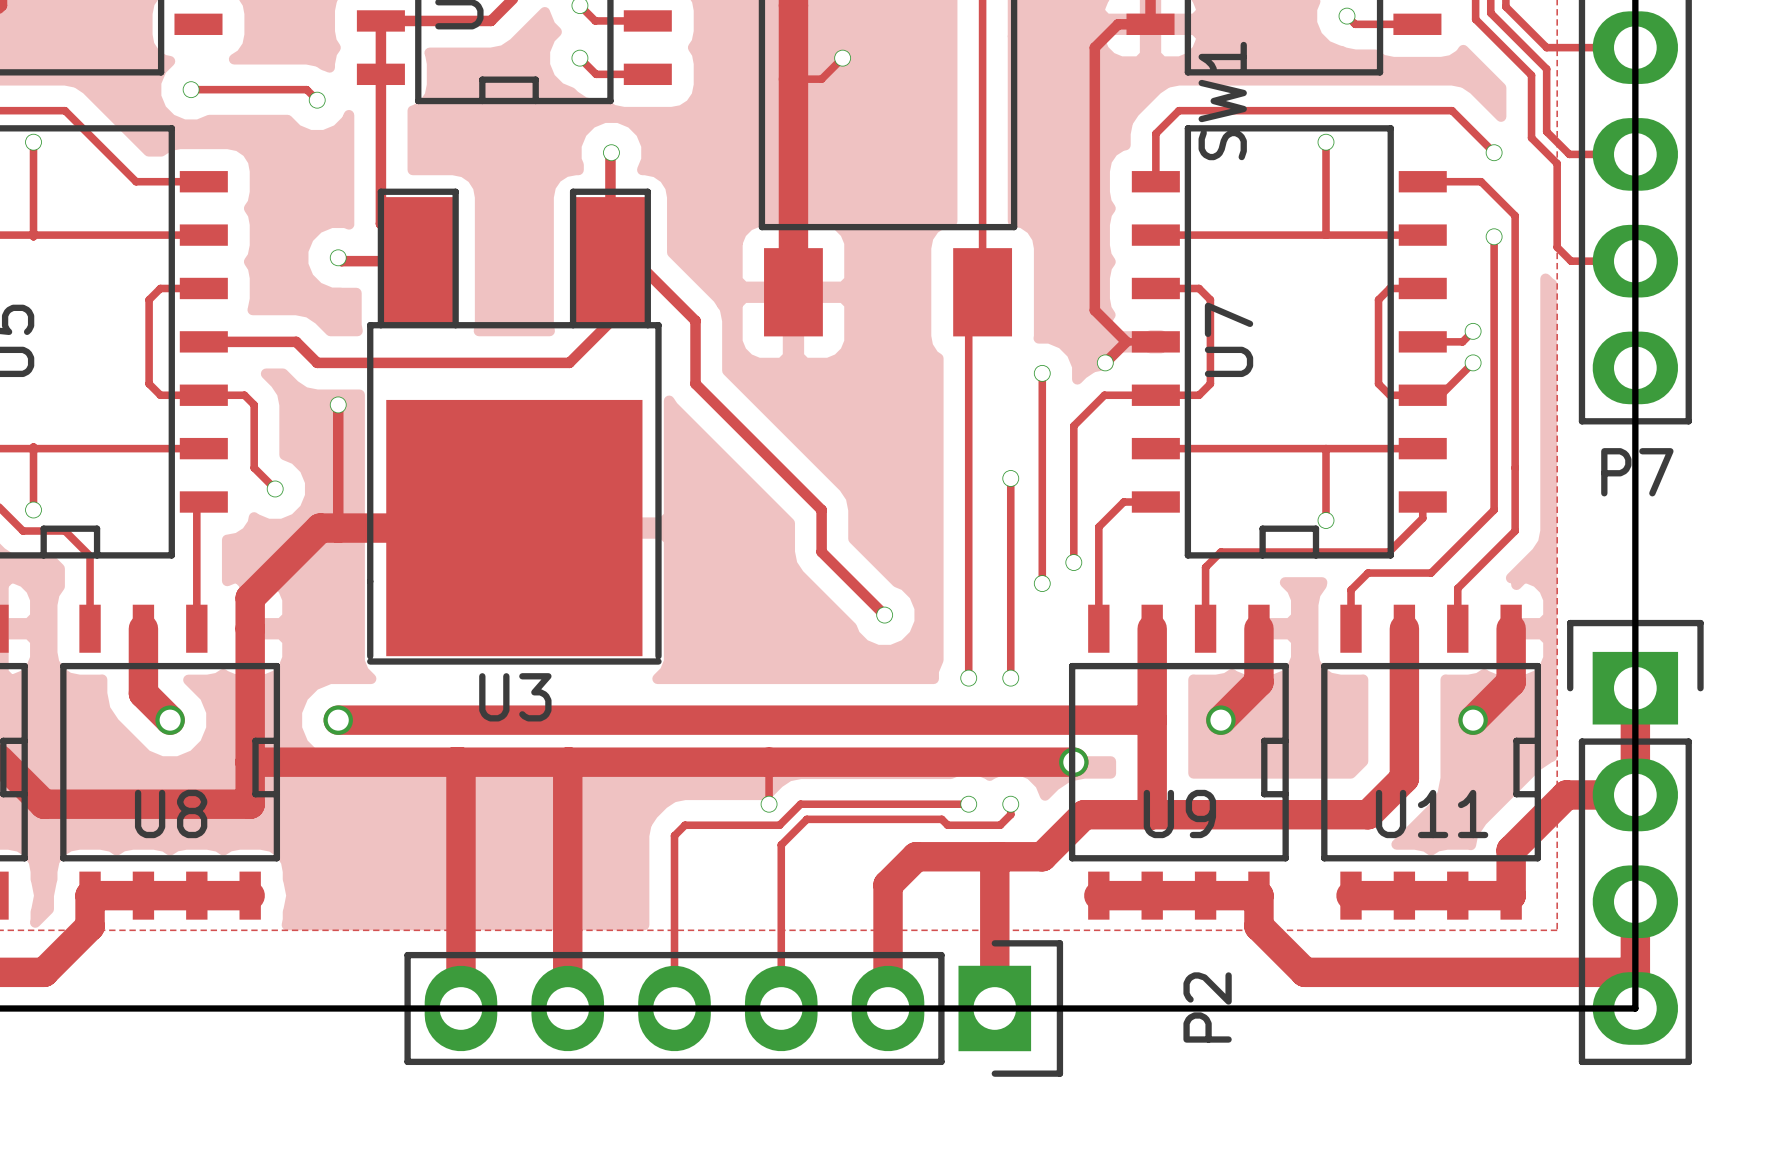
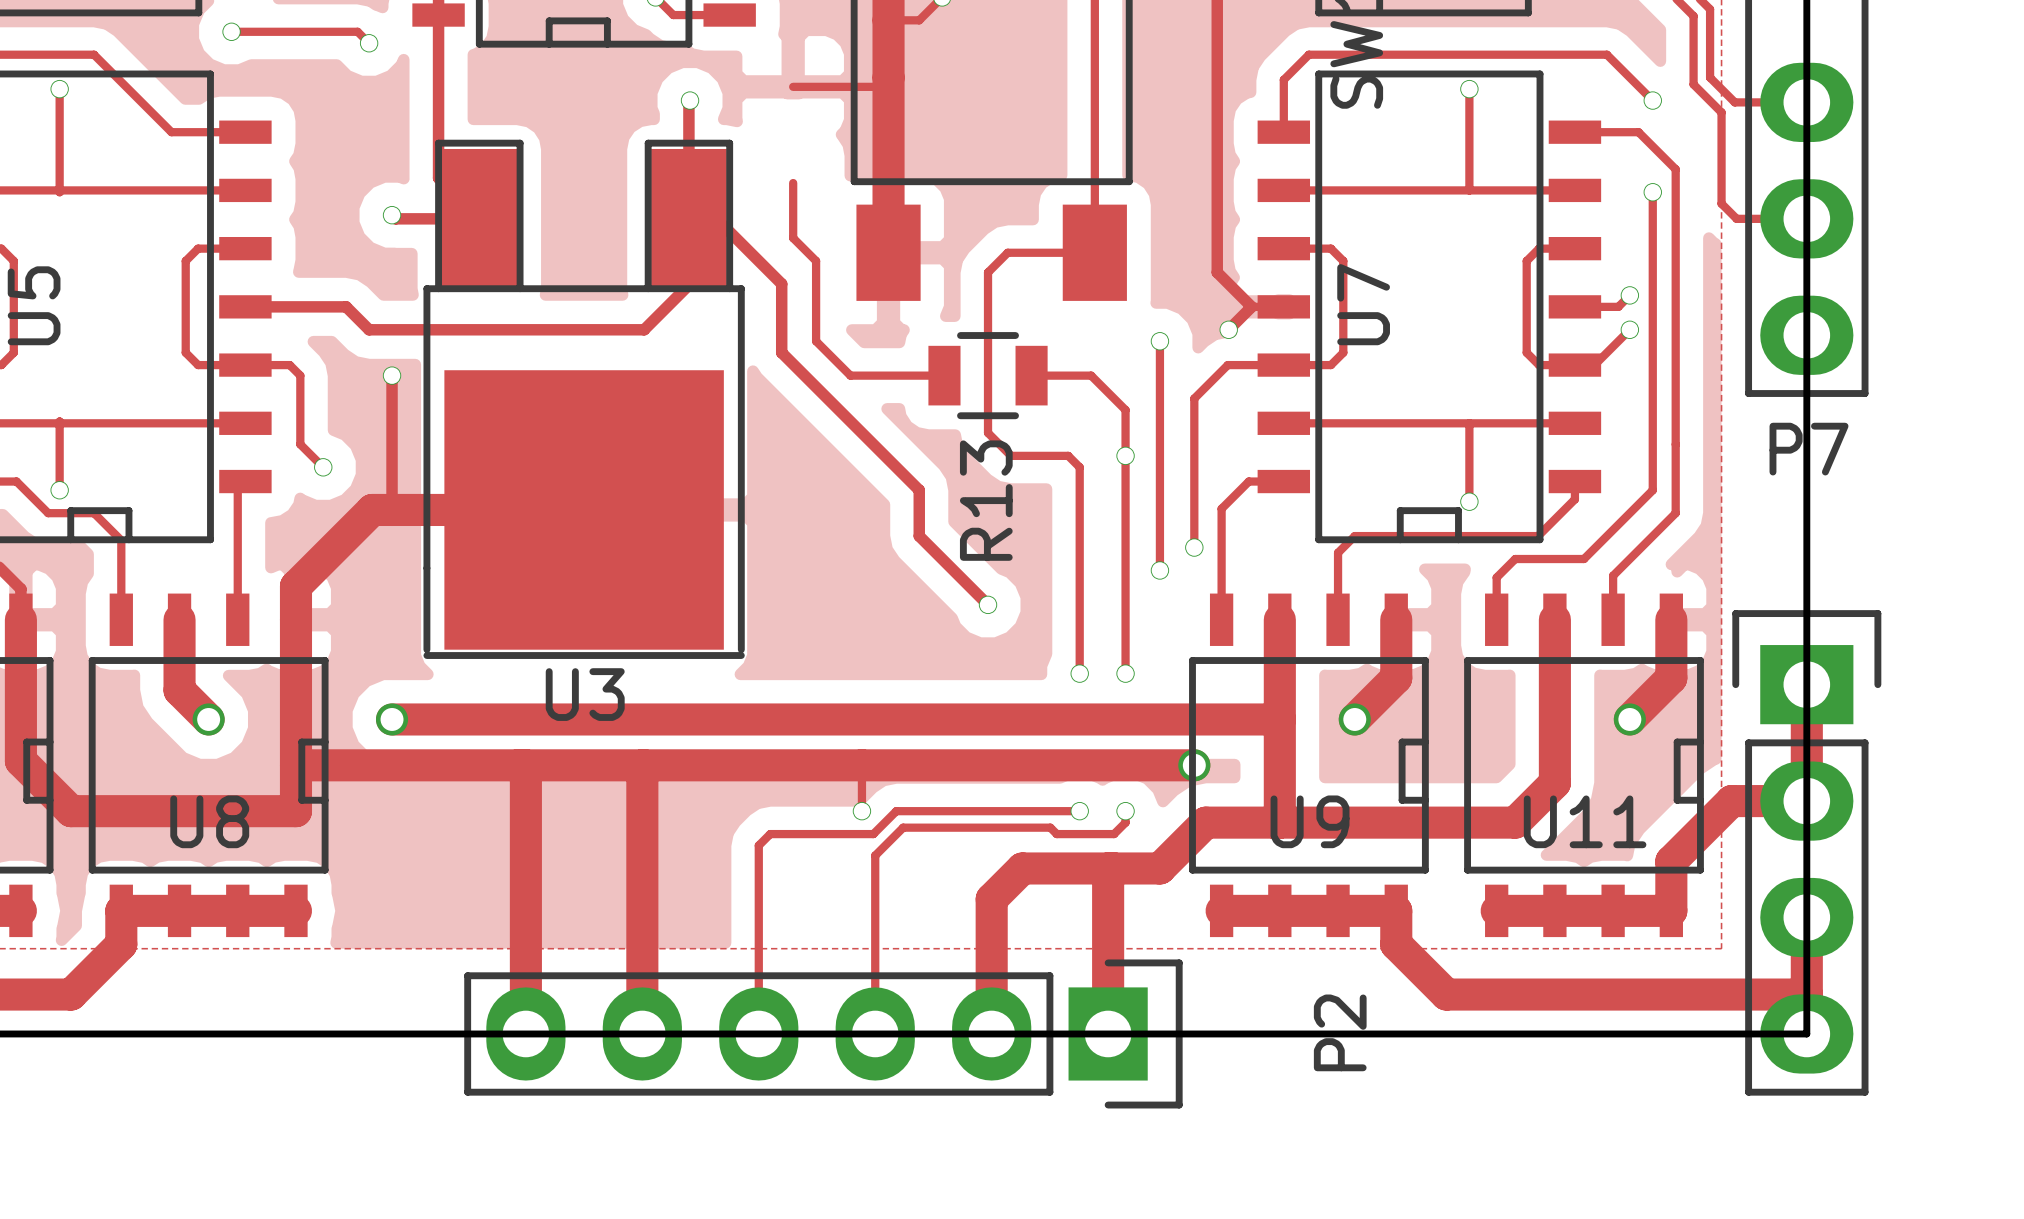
track: none -> (888, 77) (896, 77) (888, 86) (793, 86)
track: none -> (793, 183) (793, 238) (816, 261) (816, 341) (850, 375) (944, 375)
track: (968, 306) (968, 488) -> (1094, 252) (1007, 252) (988, 272) (988, 432) (1010, 455) (1068, 455) (1079, 467)
R13: none -> (988, 375)
track: none -> (1031, 375) (1091, 375) (1125, 410) (1125, 455)

